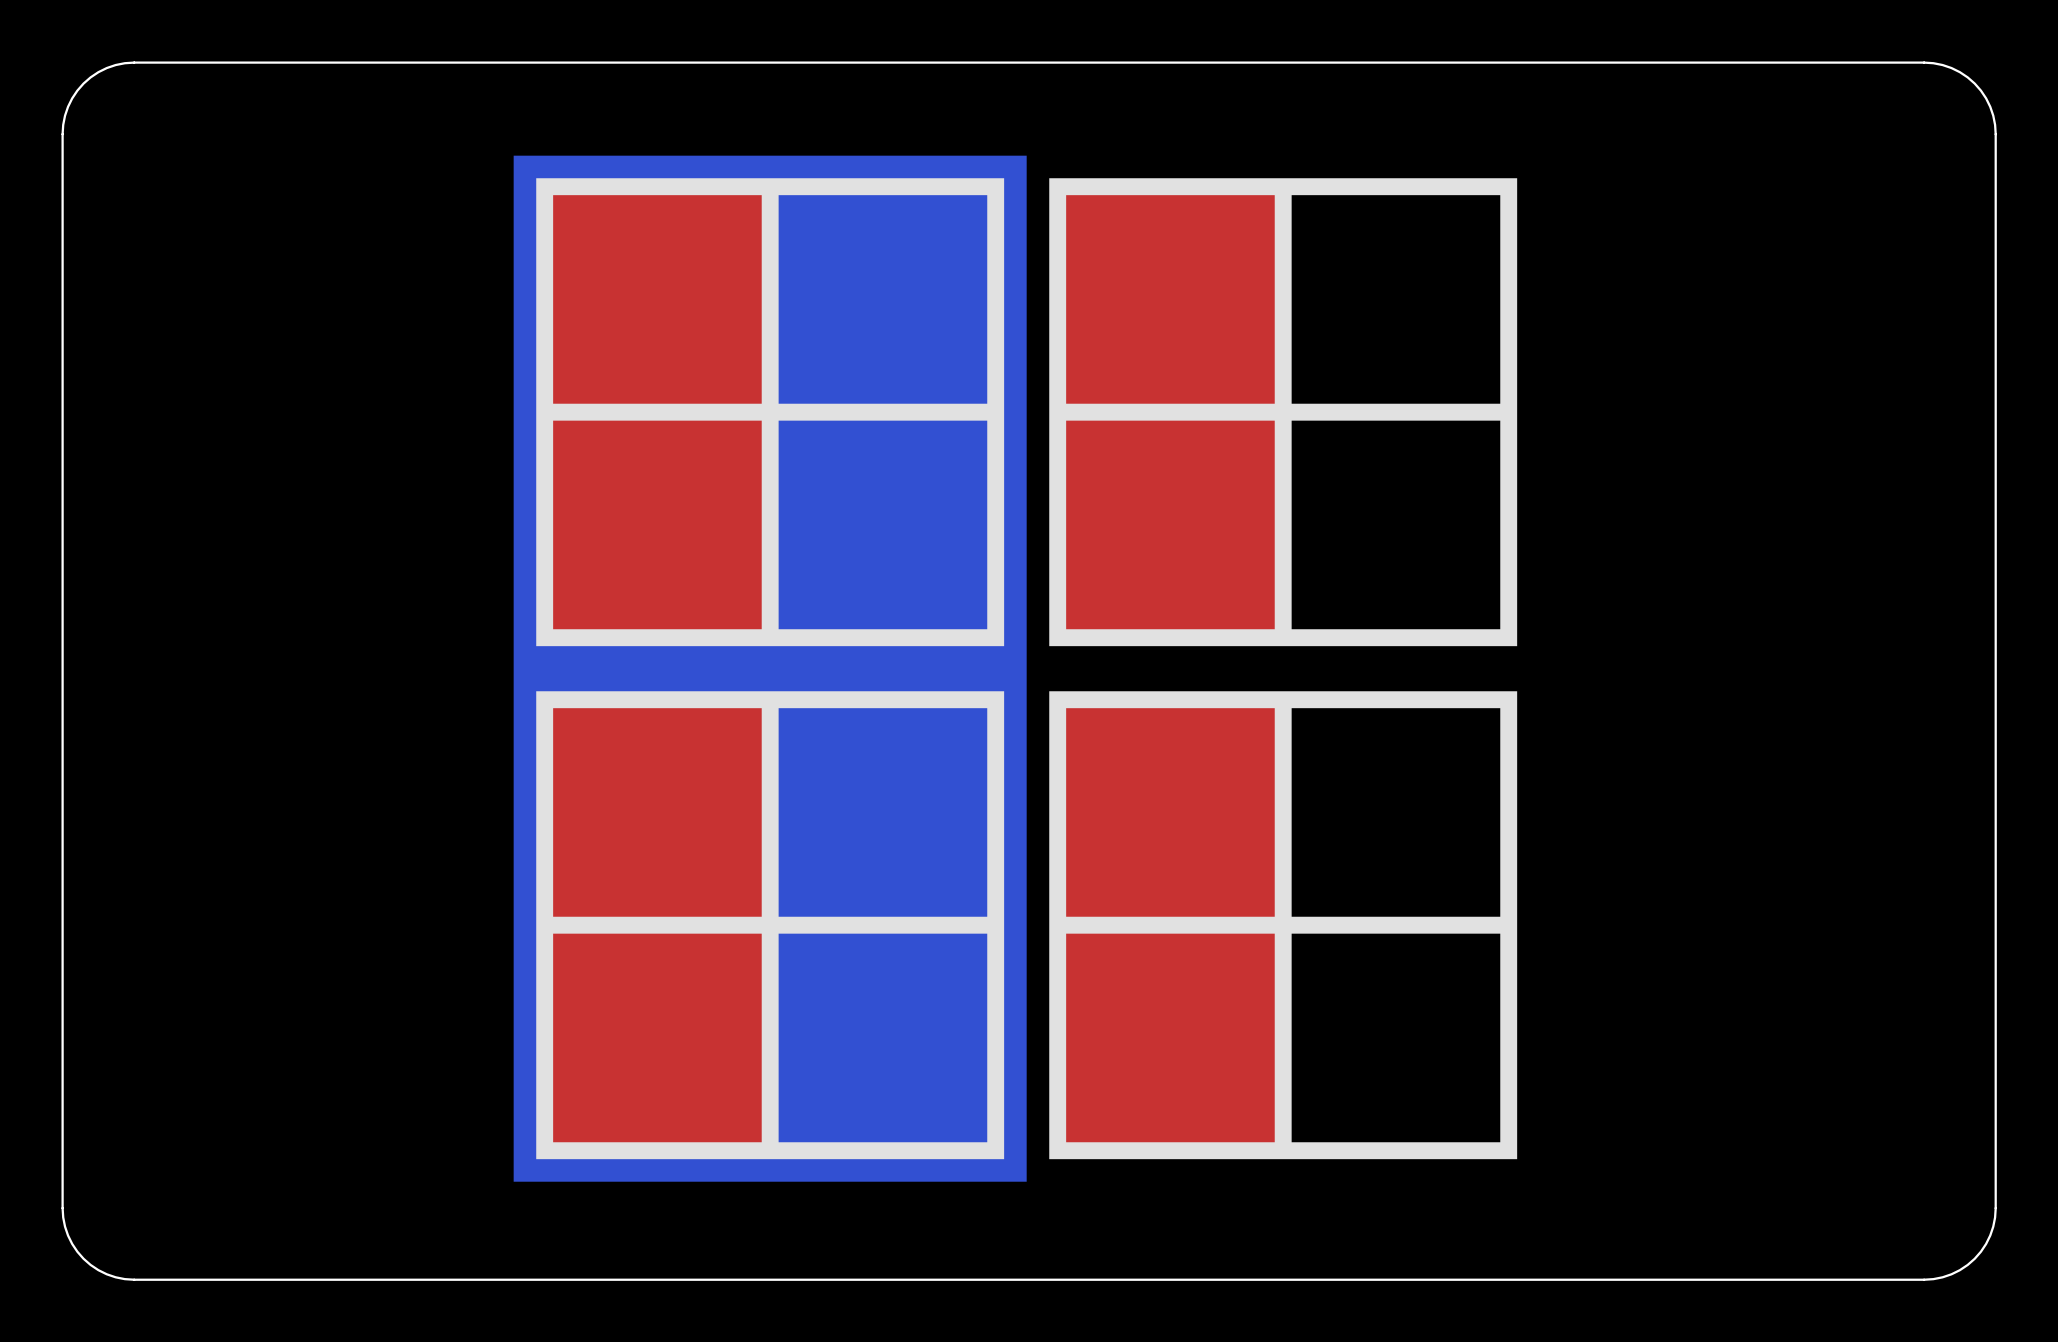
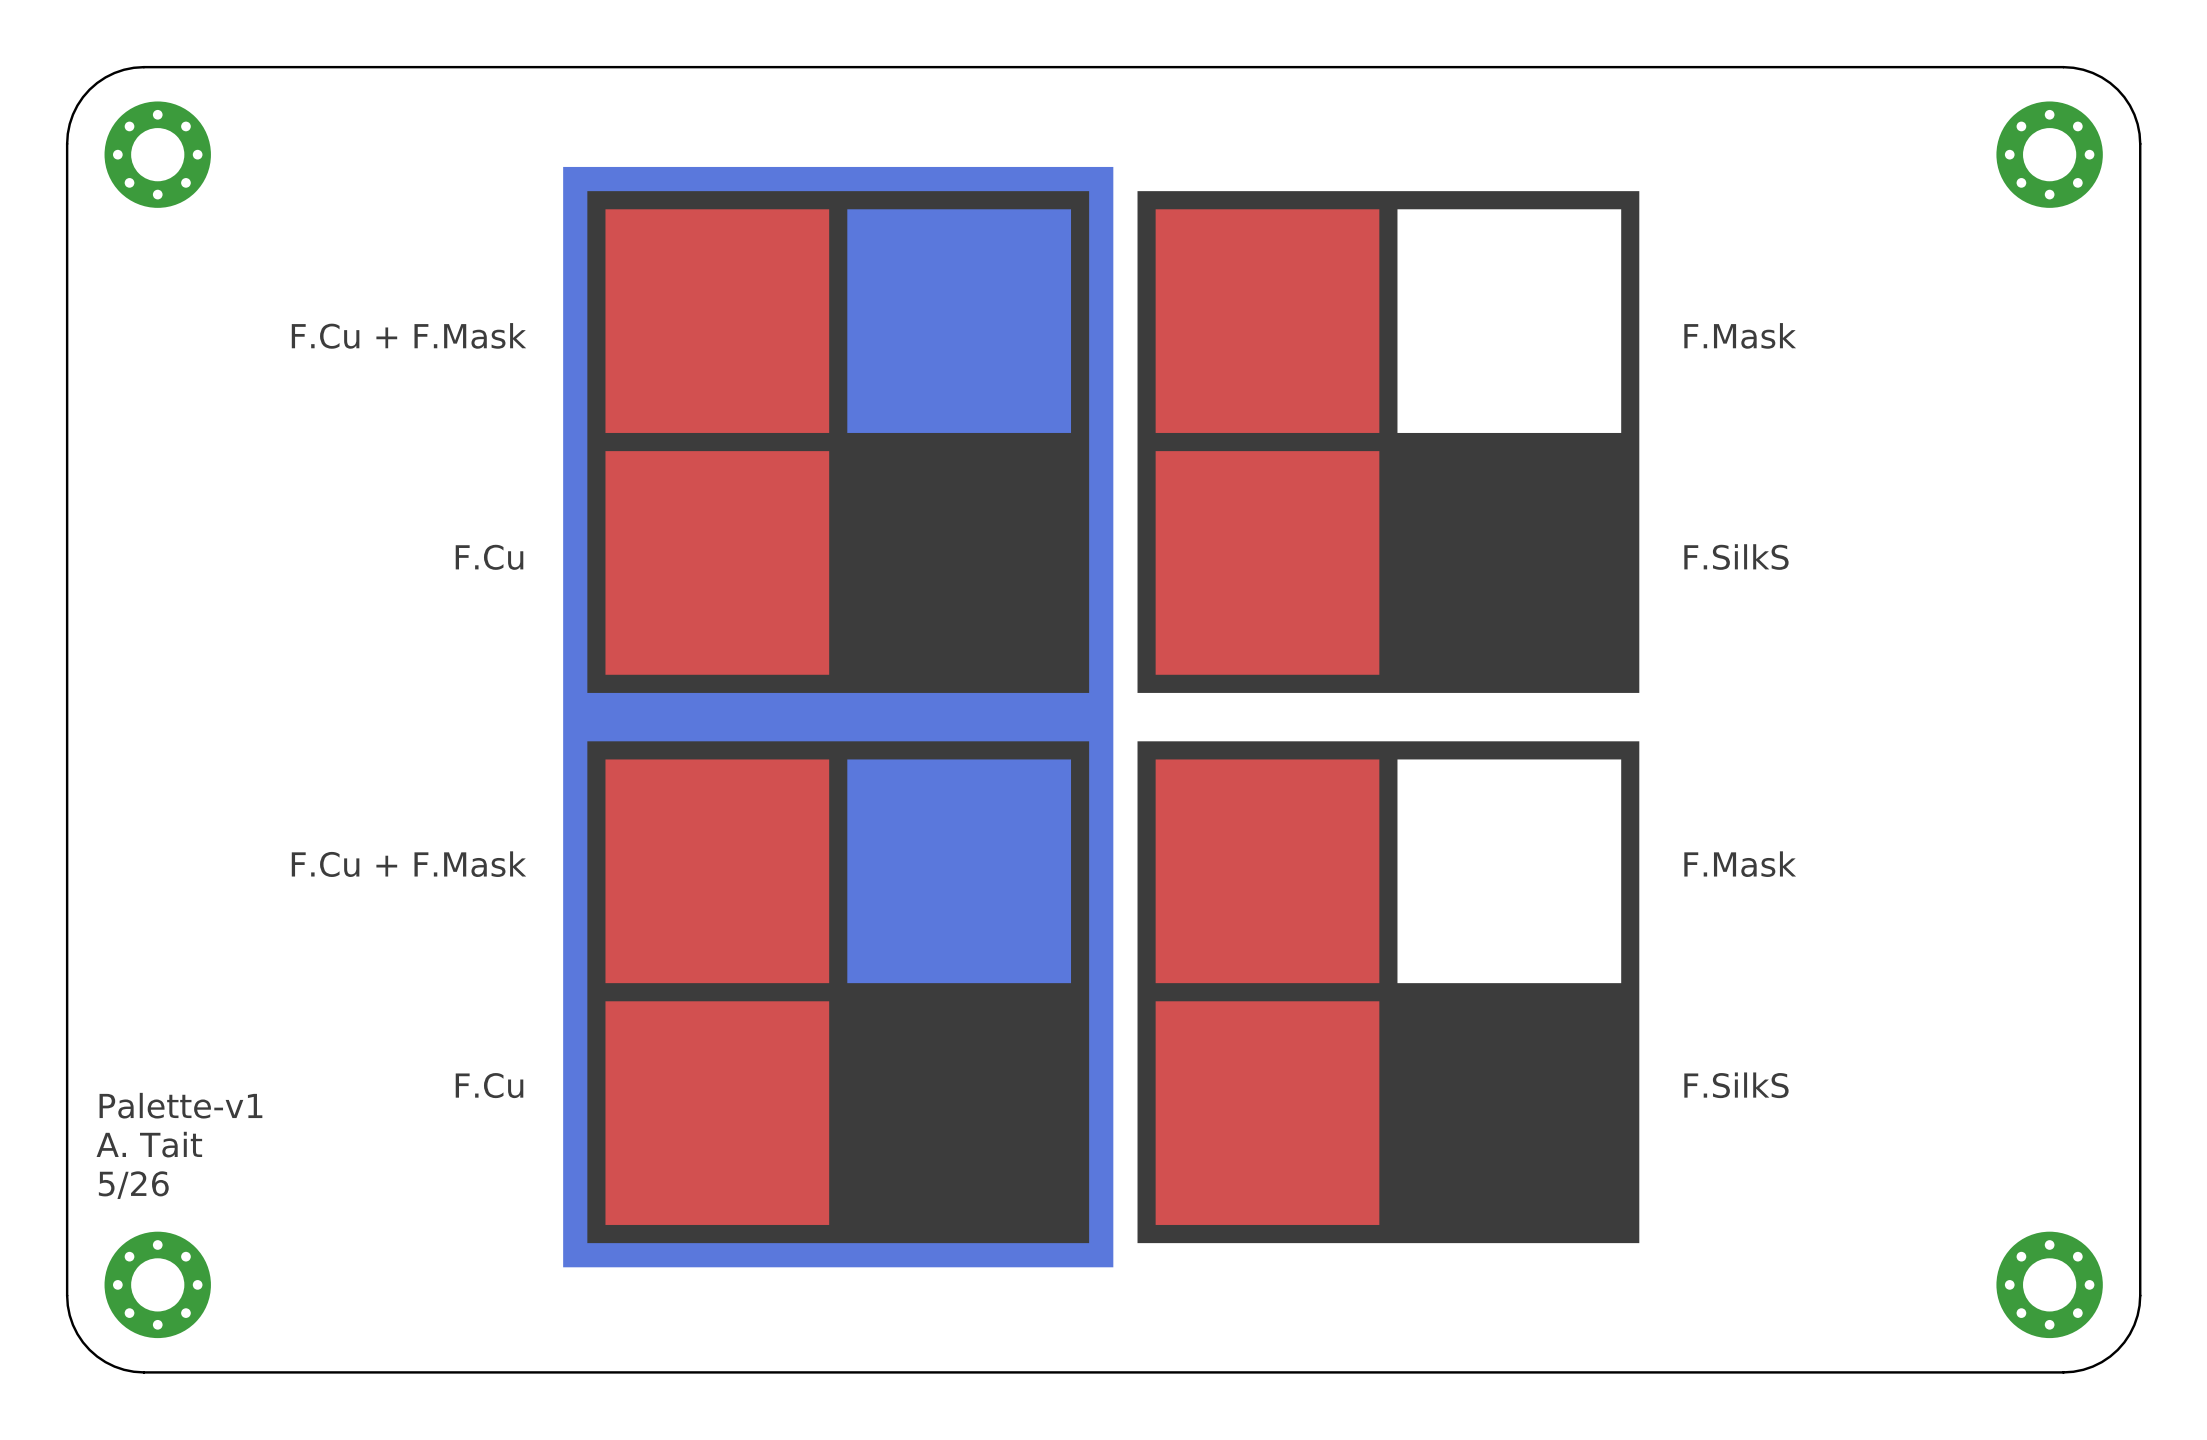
part: none -> (157, 154)
part: none -> (2049, 154)
drawing shape: [513, 155, 1518, 1182] -> [563, 166, 1640, 1268]
text: none -> F.Cu + F.Mask (408, 335)
text: none -> F.Mask (1740, 335)
text: none -> F.Cu (489, 557)
text: none -> F.SilkS (1736, 557)
text: none -> F.Cu + F.Mask (408, 864)
text: none -> F.Mask (1740, 864)
text: none -> F.Cu (489, 1085)
text: none -> F.SilkS (1736, 1085)
text: none -> Palette-v1 (180, 1105)
text: none -> A. Tait (149, 1144)
text: none -> 5/26 (133, 1185)
part: none -> (157, 1284)
part: none -> (2049, 1284)

